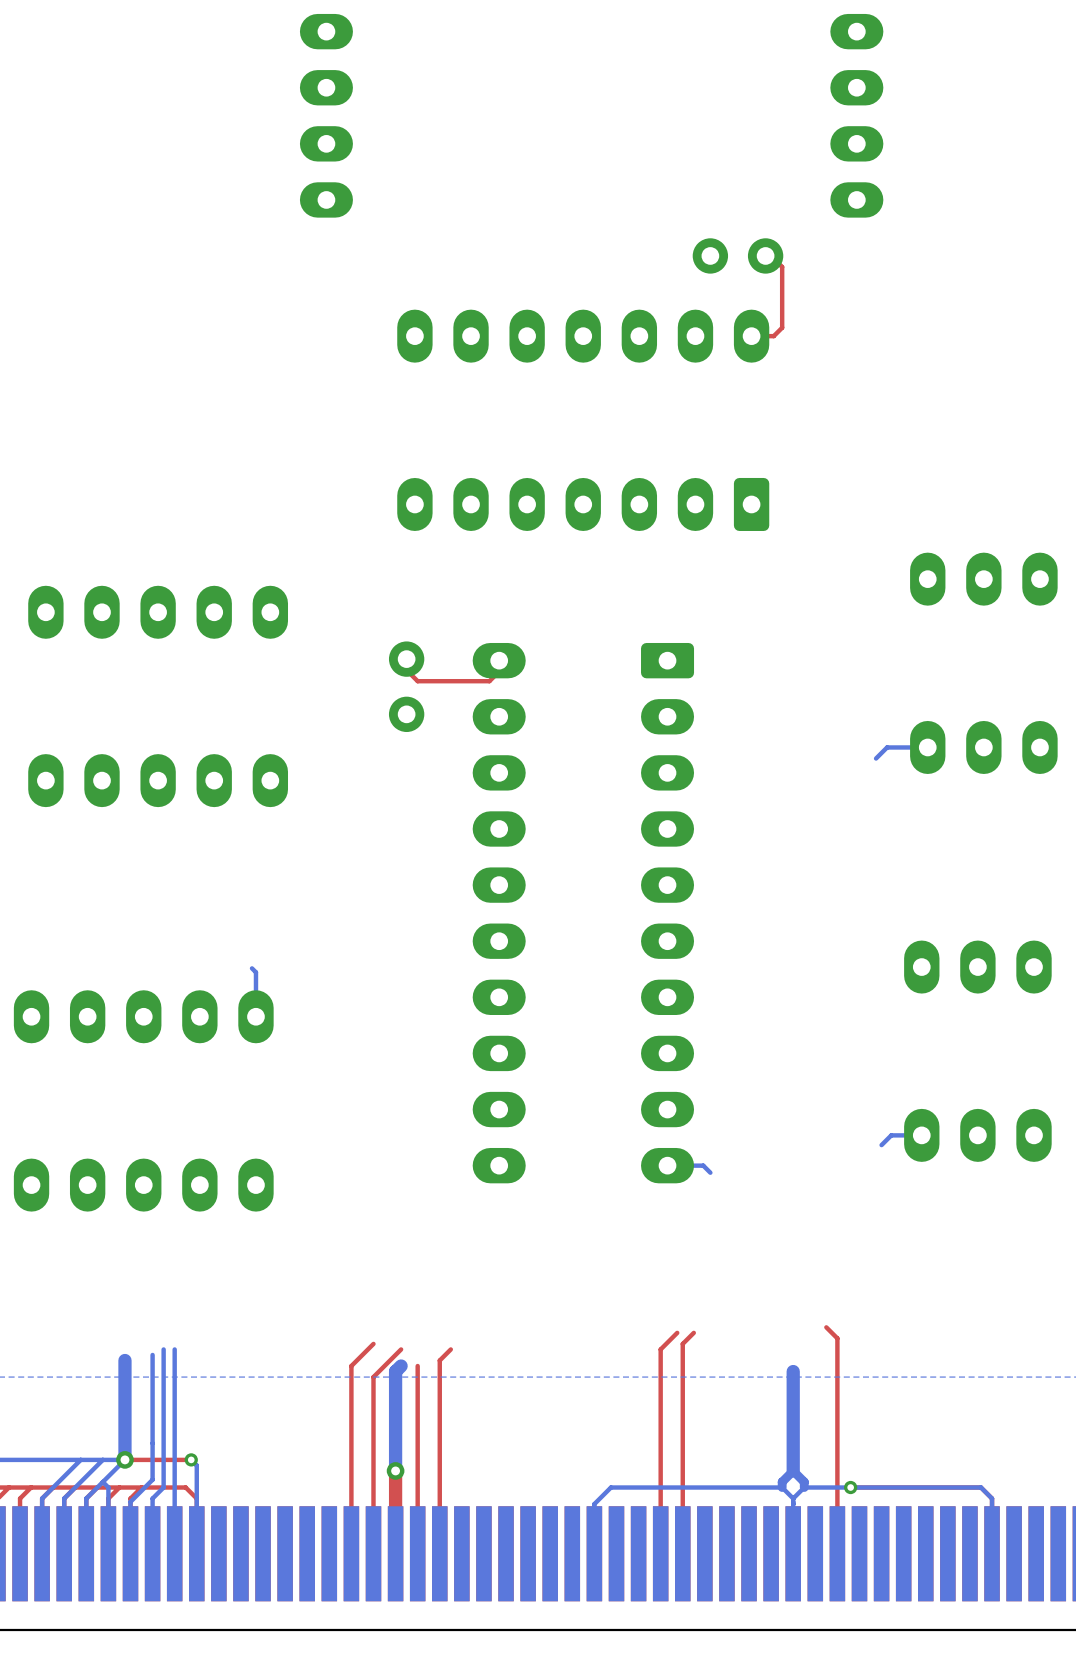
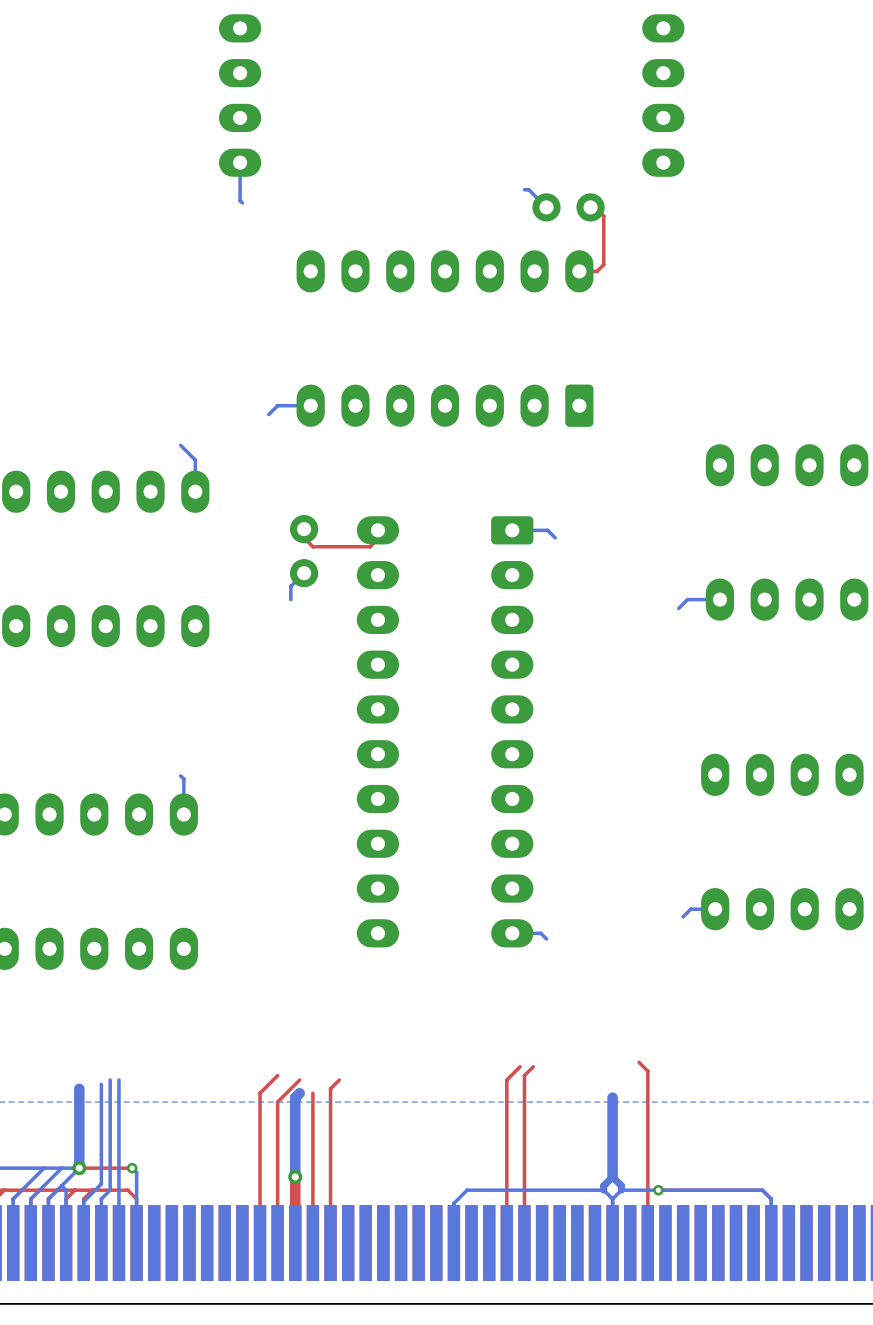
bottom track: none -> (240, 162) (240, 200) (242, 202)
bottom track: none -> (524, 189) (528, 189) (546, 207)
bottom track: none -> (310, 405) (277, 405) (268, 414)
bottom track: none -> (180, 445) (195, 460) (195, 491)
bottom track: none -> (512, 530) (547, 530) (555, 537)
bottom track: none -> (304, 573) (290, 586) (290, 599)

